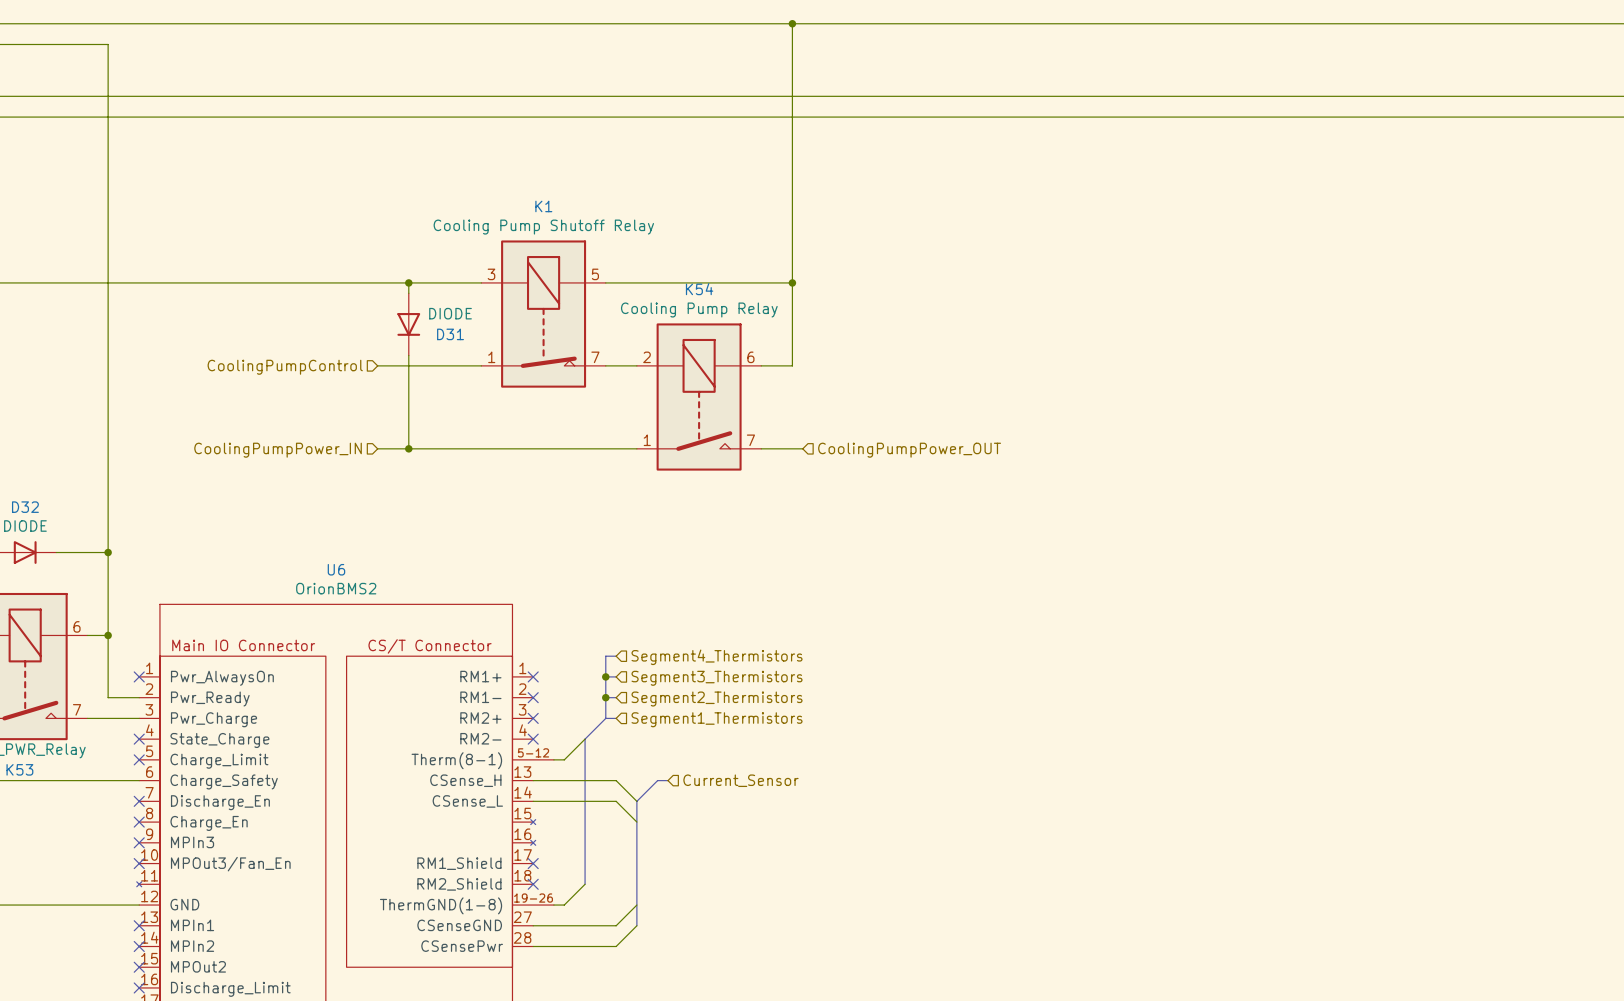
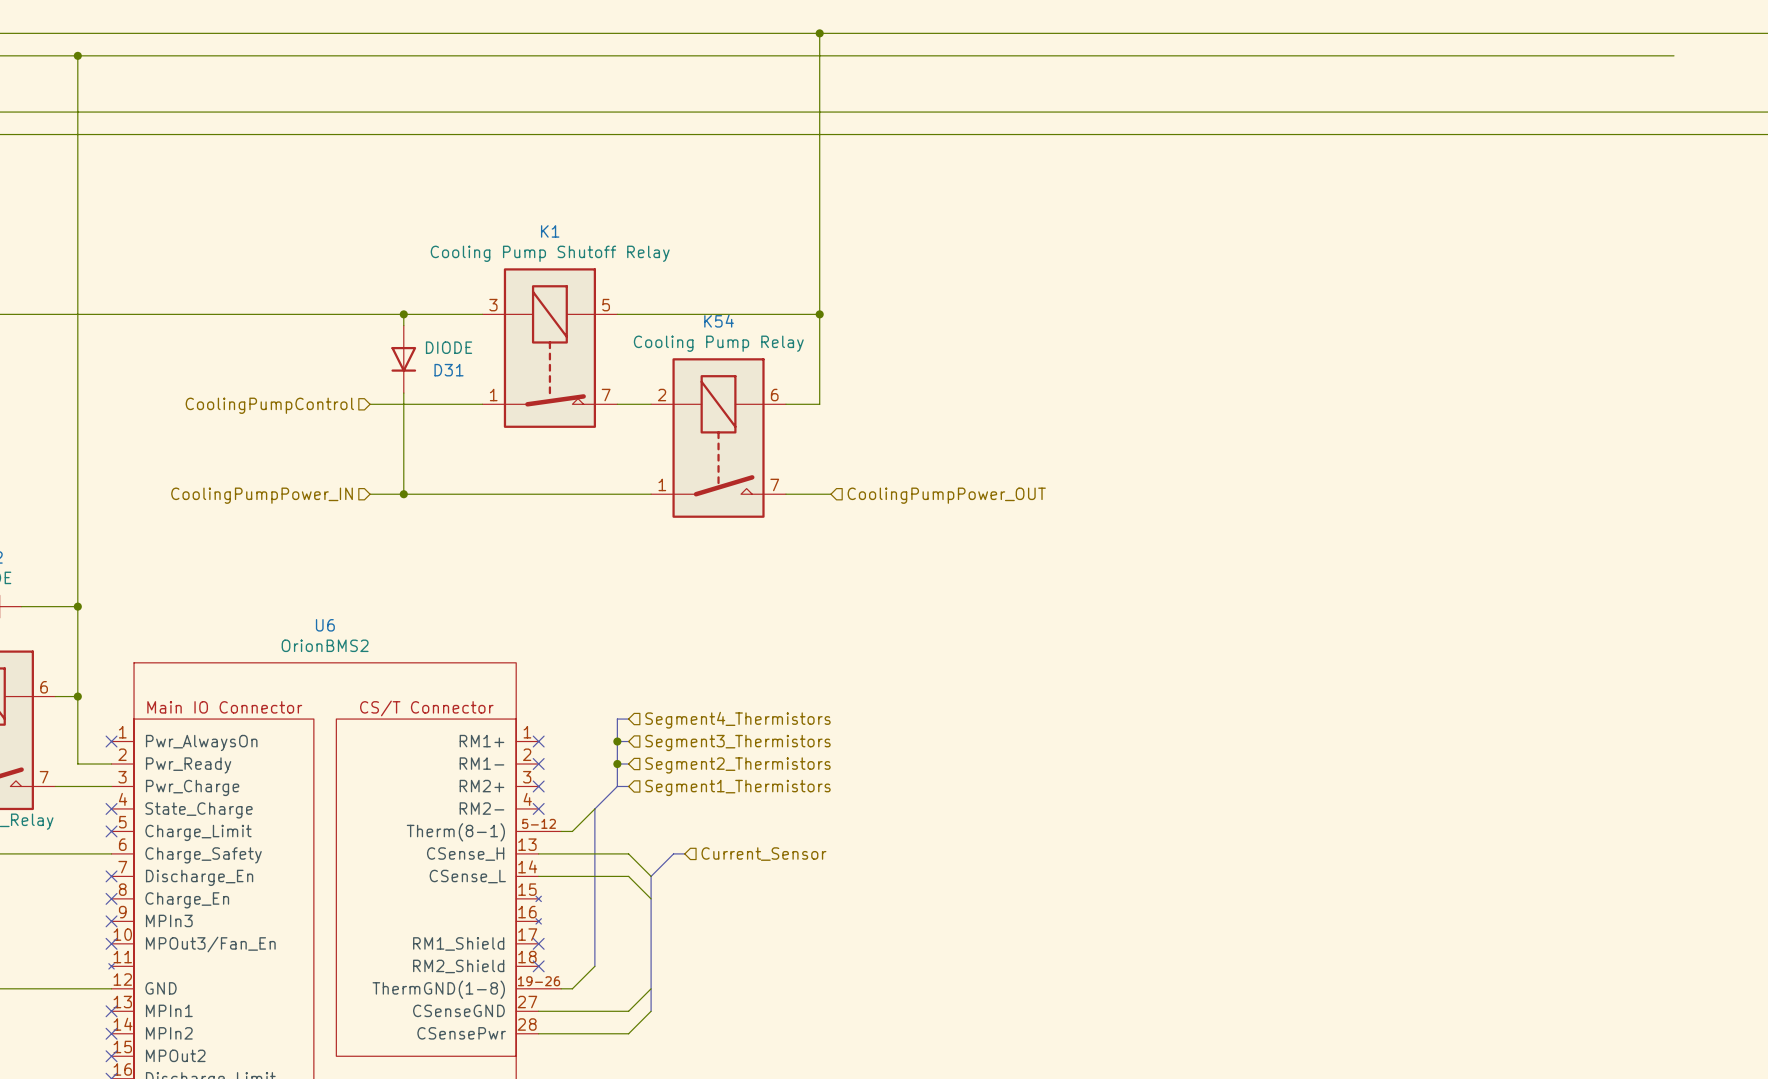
wire: none -> (77, 55) (1673, 55)
junction: none -> (77, 55)

